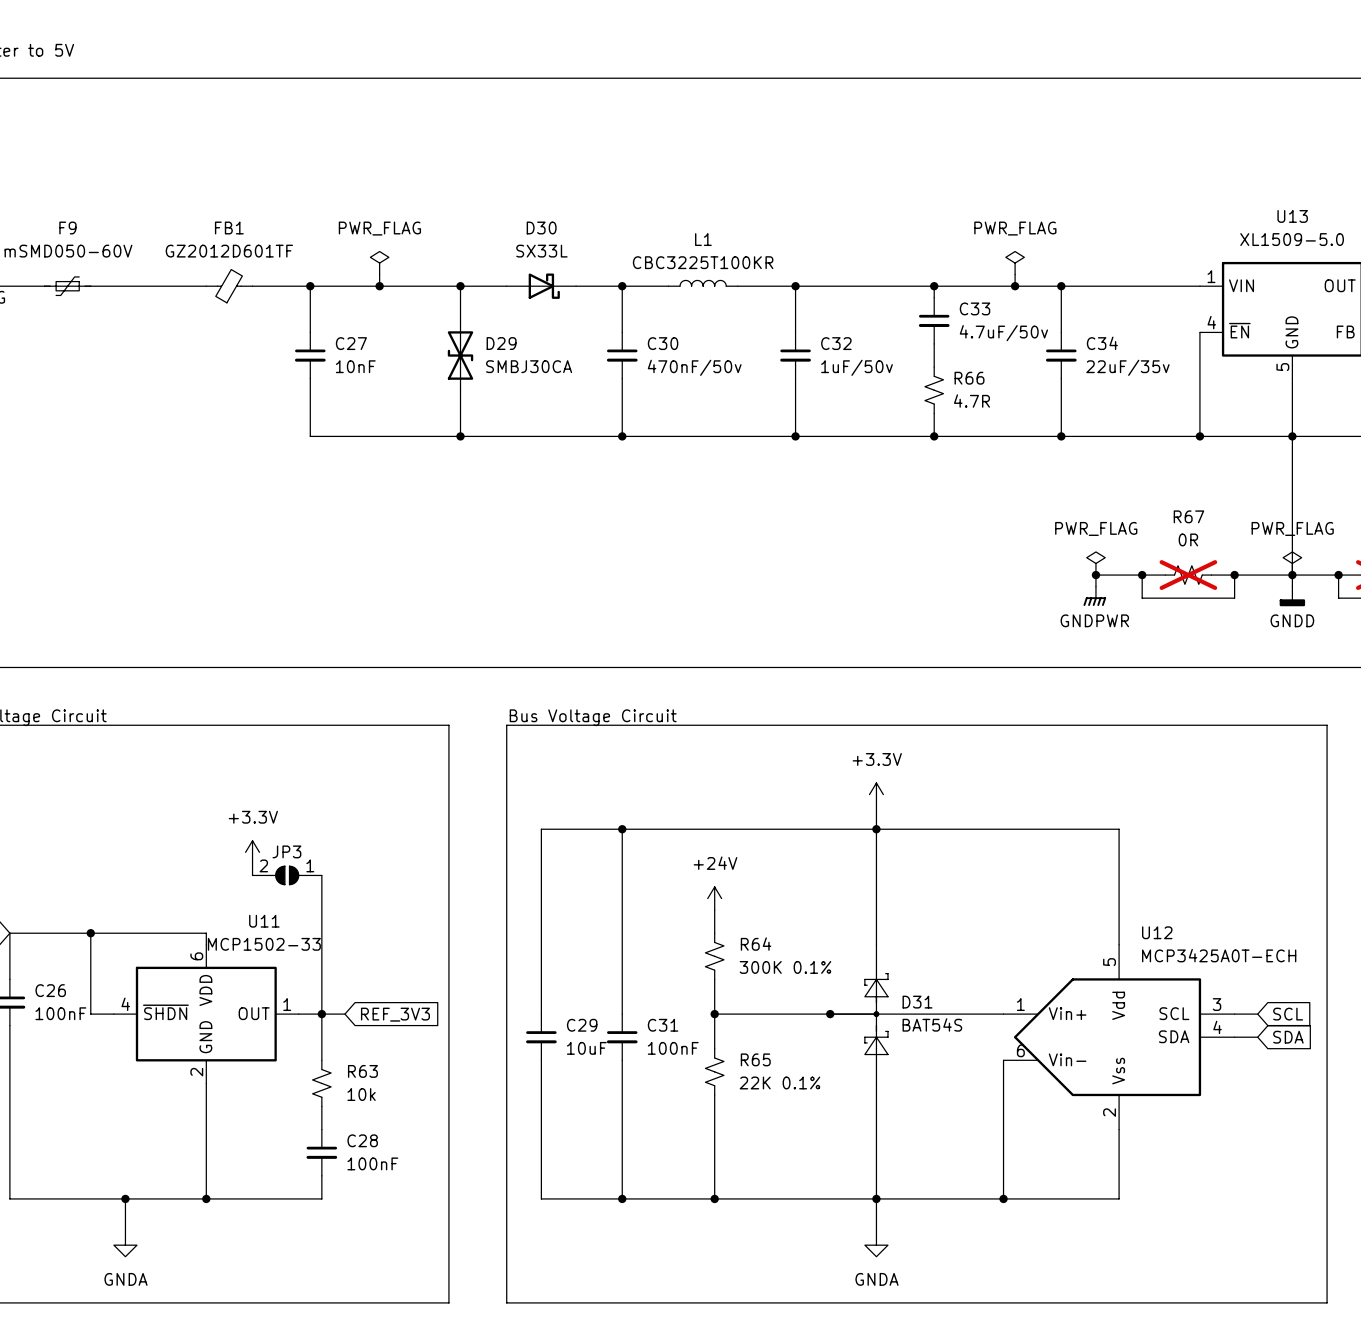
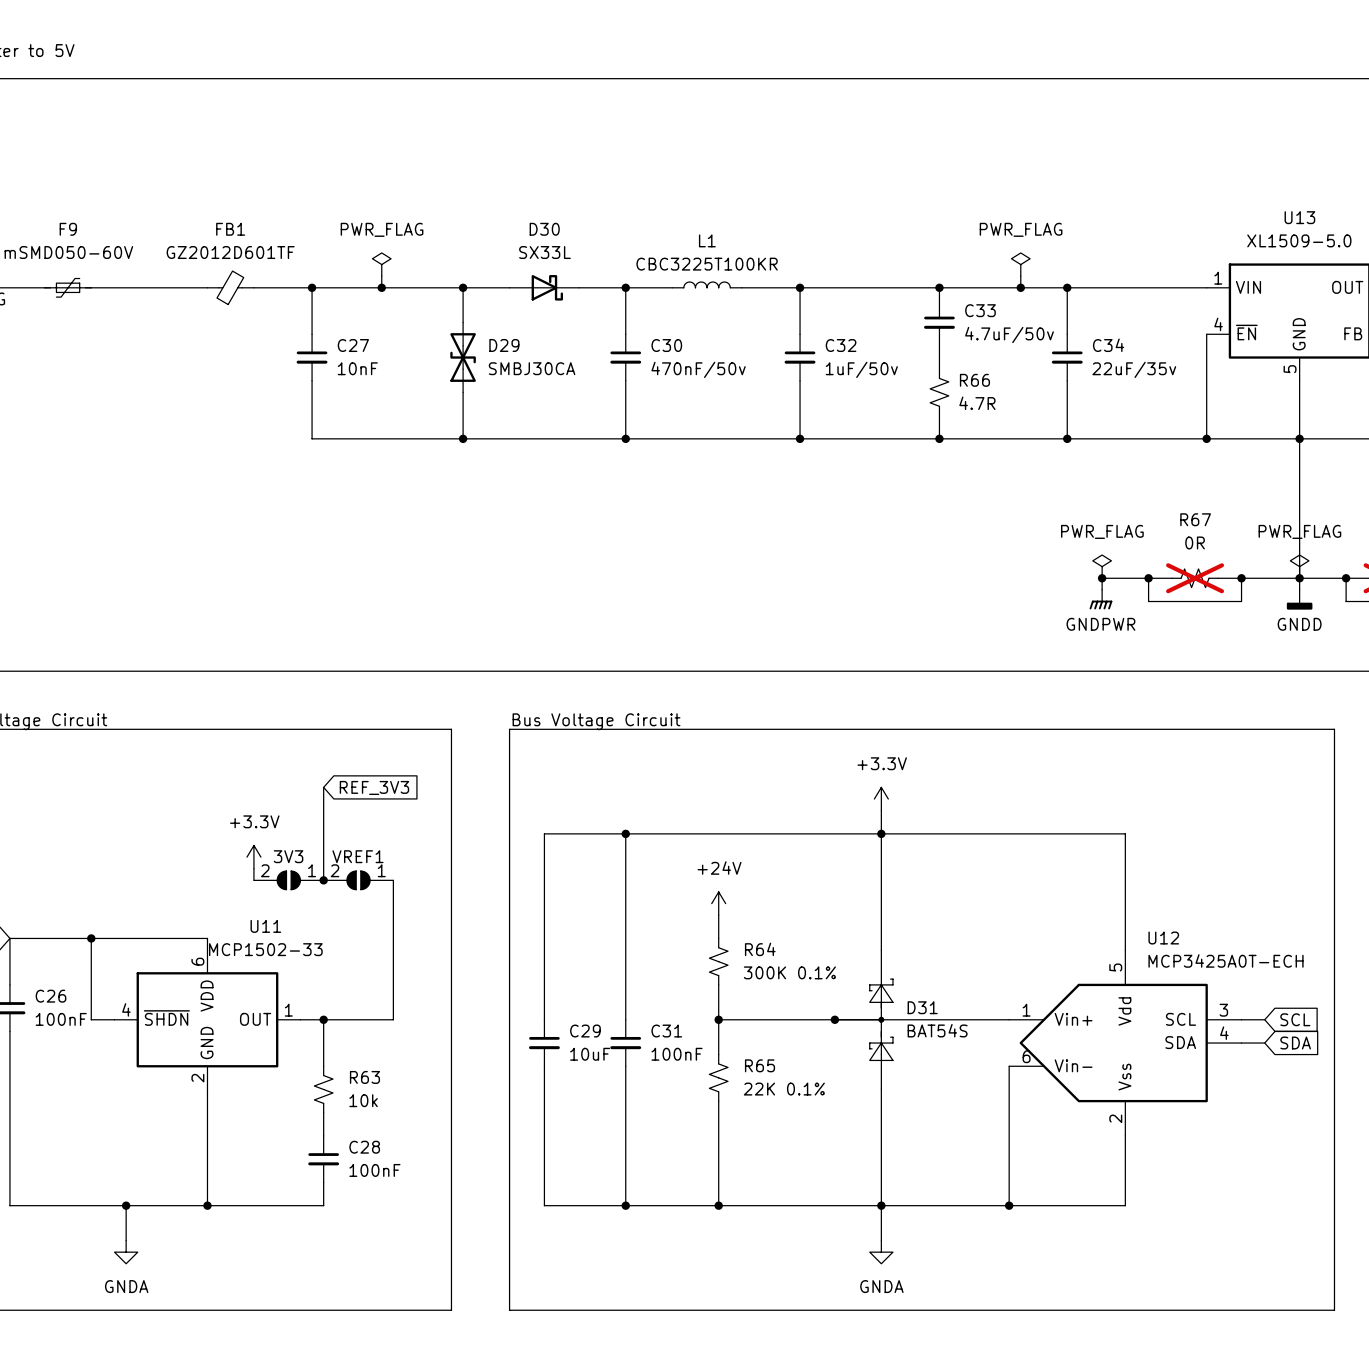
global label: none -> REF_3V3 (374, 787)
JP3 name: JP3 (286, 851) -> 3V3 (288, 856)
wire: (321, 875) (321, 1014) -> (323, 880) (323, 787)
junction: none -> (323, 880)
VREF1: none -> (358, 880)
wire: none -> (393, 880) (393, 1019) (346, 1019)
global label: REF_3V3 (395, 1014) -> none

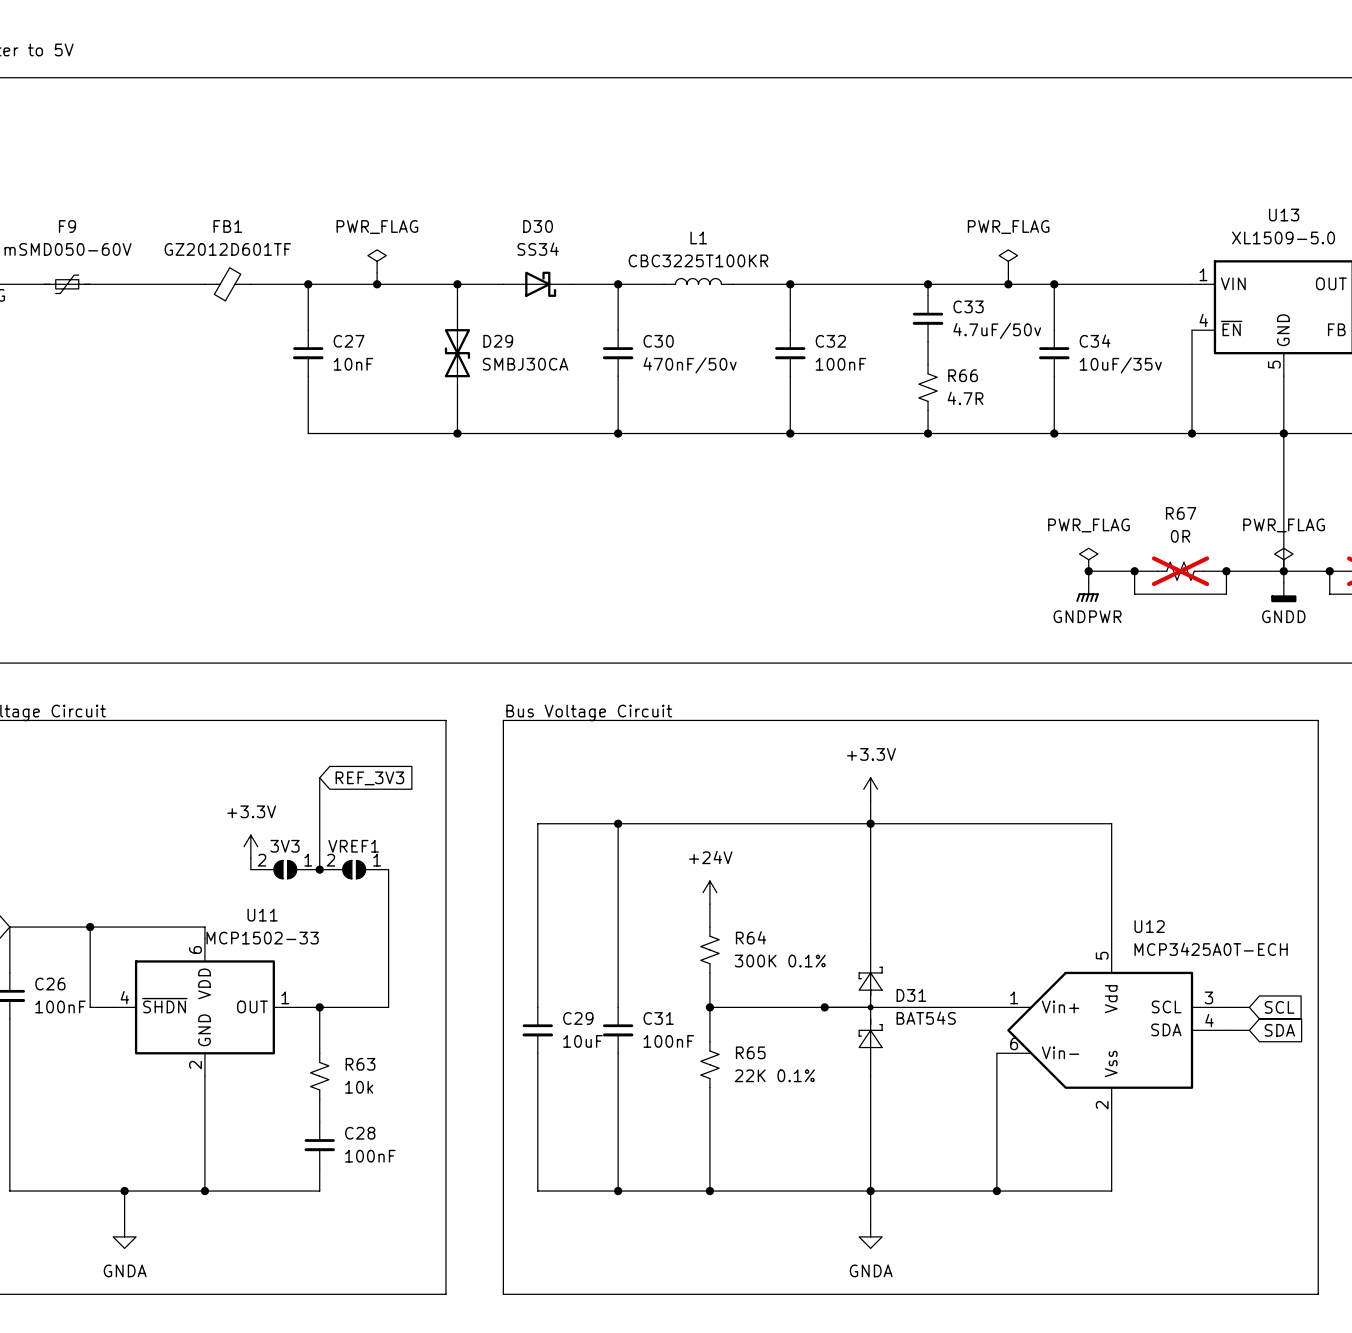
D30 value: SX33L (544, 252) -> SS34 (538, 249)
C32 value: 1uF/50v (861, 369) -> 100nF (840, 364)
C34 value: 22uF/35v (1134, 369) -> 10uF/35v (1120, 365)

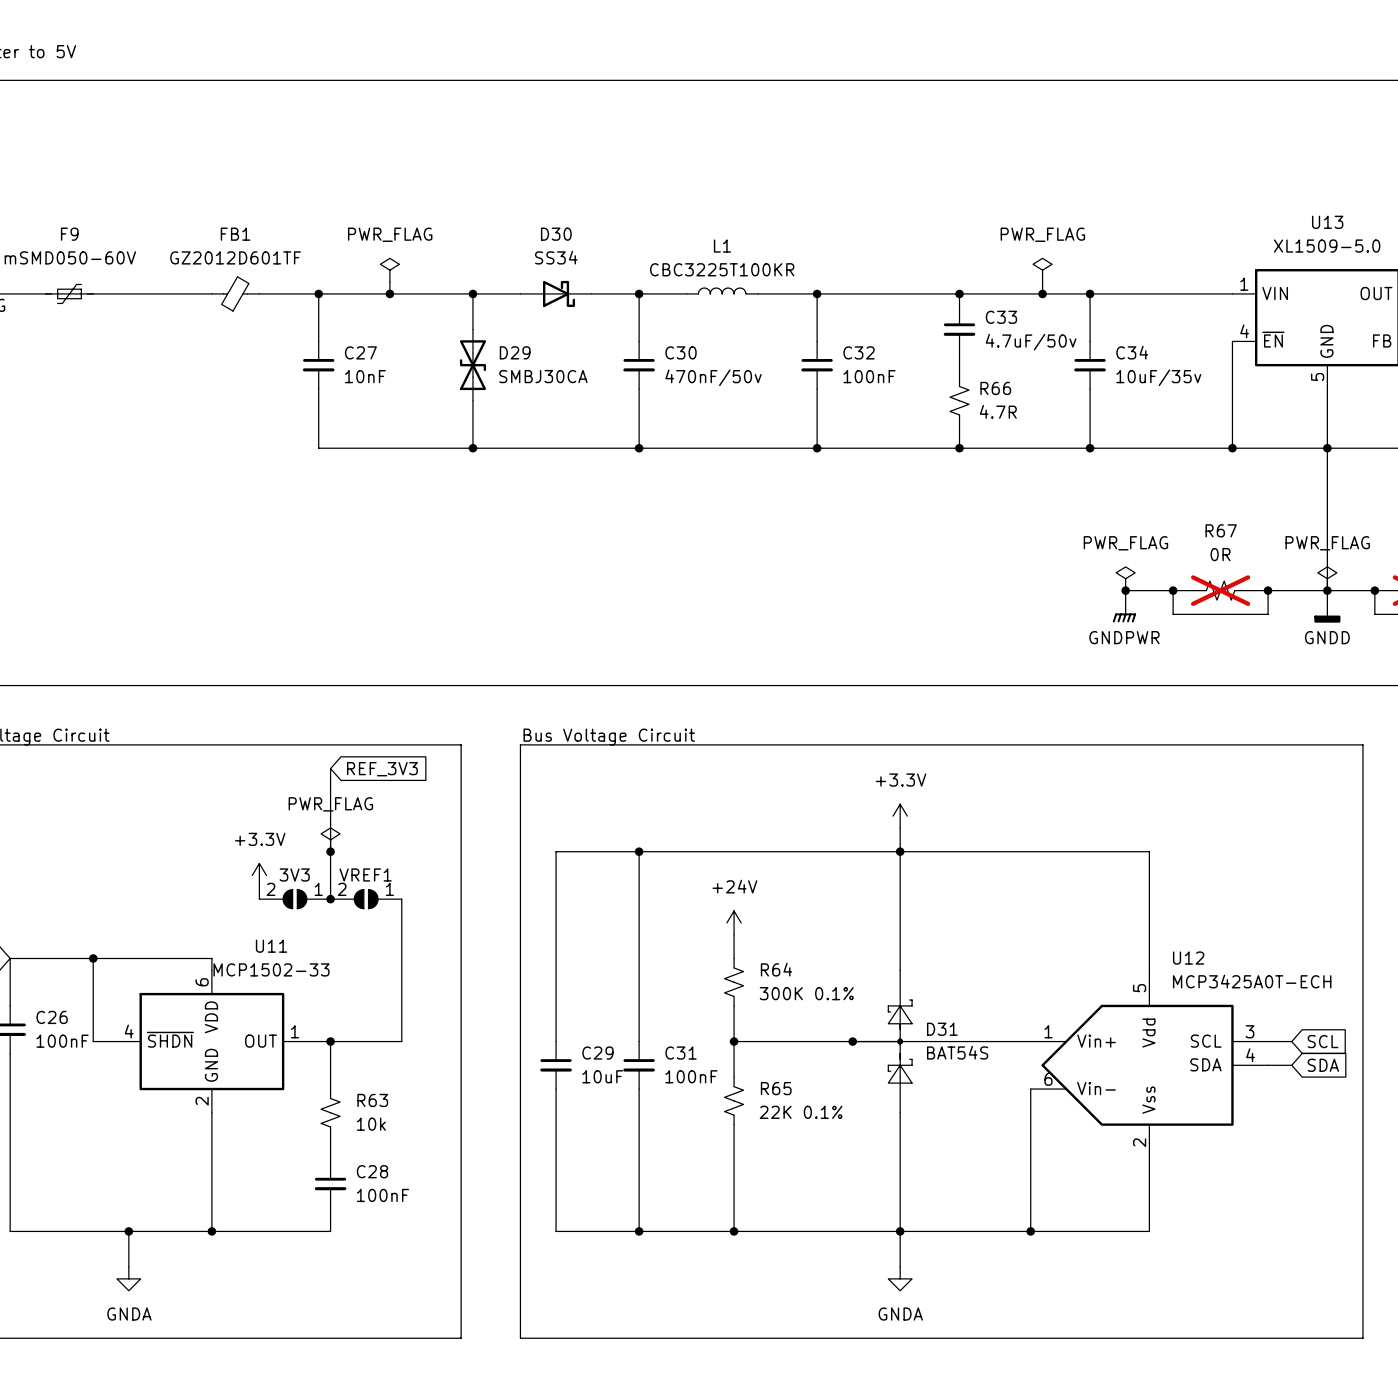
wire: none -> (330, 768) (330, 804)
global label position: REF_3V3 (369, 778) -> REF_3V3 (382, 769)
power symbol: none -> PWR_FLAG (330, 839)
junction: none -> (330, 851)

